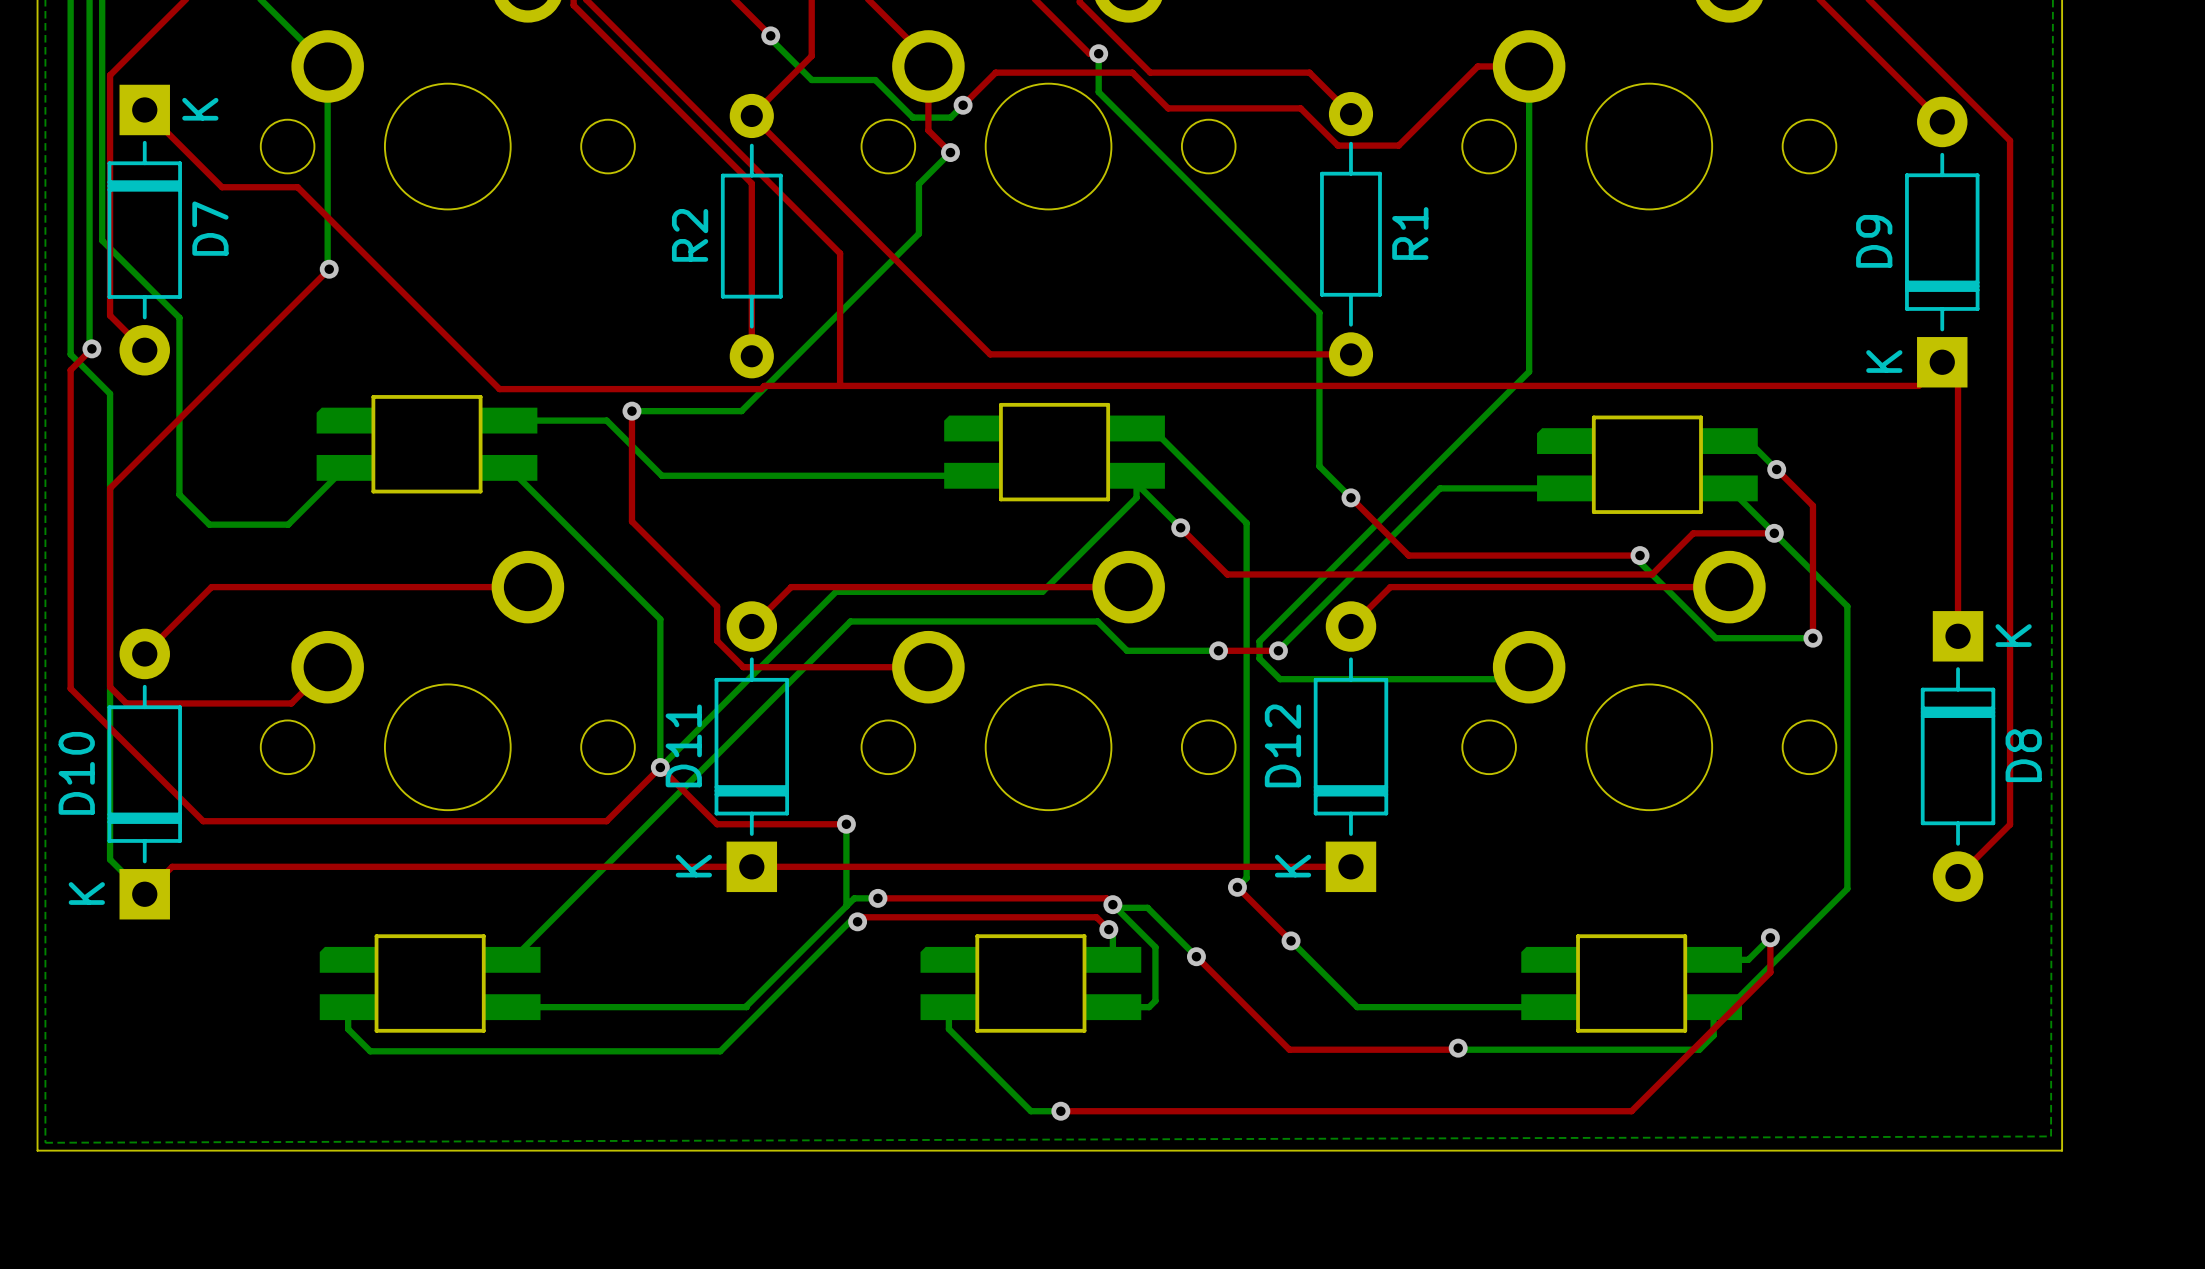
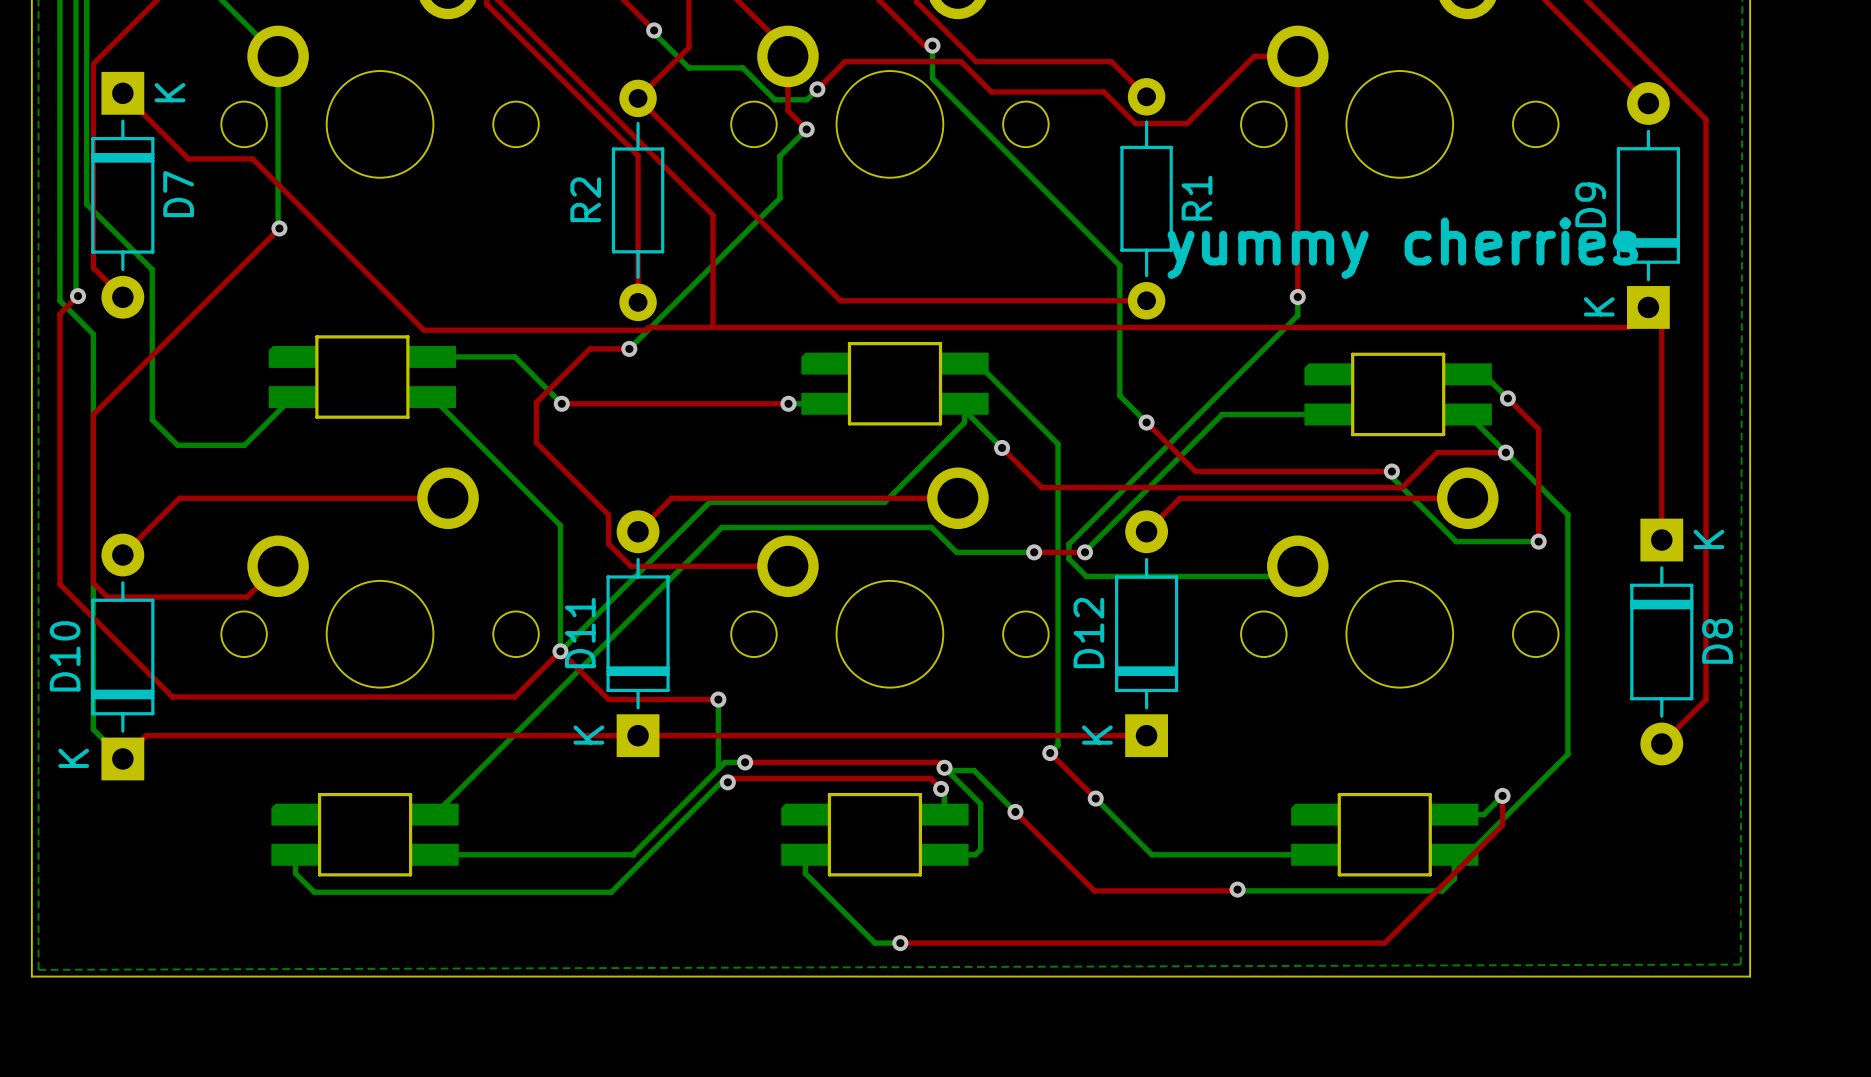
top track: none -> (1297, 56) (1297, 297)
bottom track: (1529, 66) (1529, 349) -> none
text: none -> yummy cherries (1402, 248)
via: none -> (1297, 297)
top track: (631, 411) (631, 474) -> (629, 348) (589, 348) (536, 402)
bottom track: (631, 411) (741, 411) -> none
via: (631, 411) -> none
via: none -> (629, 348)
top track: none -> (561, 403) (788, 403)
bottom track: (661, 475) (929, 475) -> none
via: none -> (561, 403)
via: none -> (788, 403)

